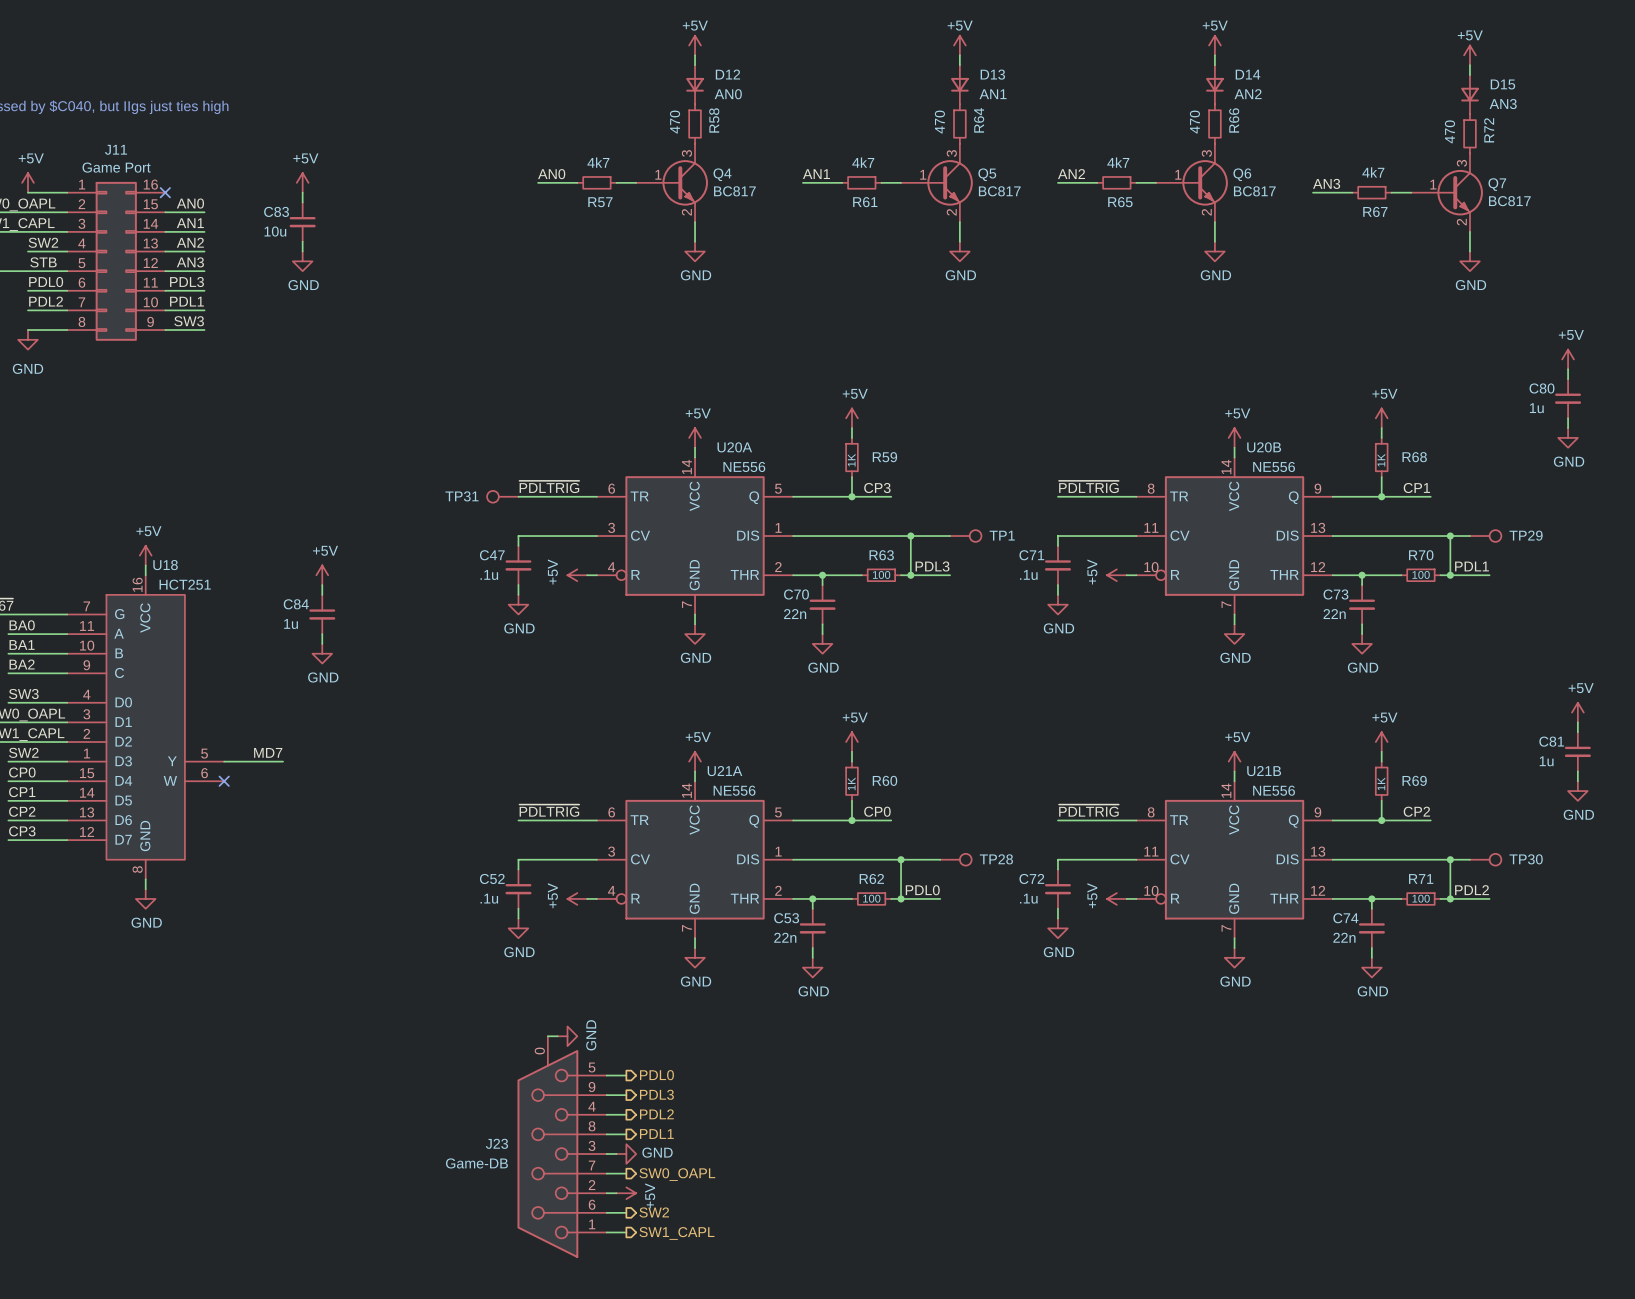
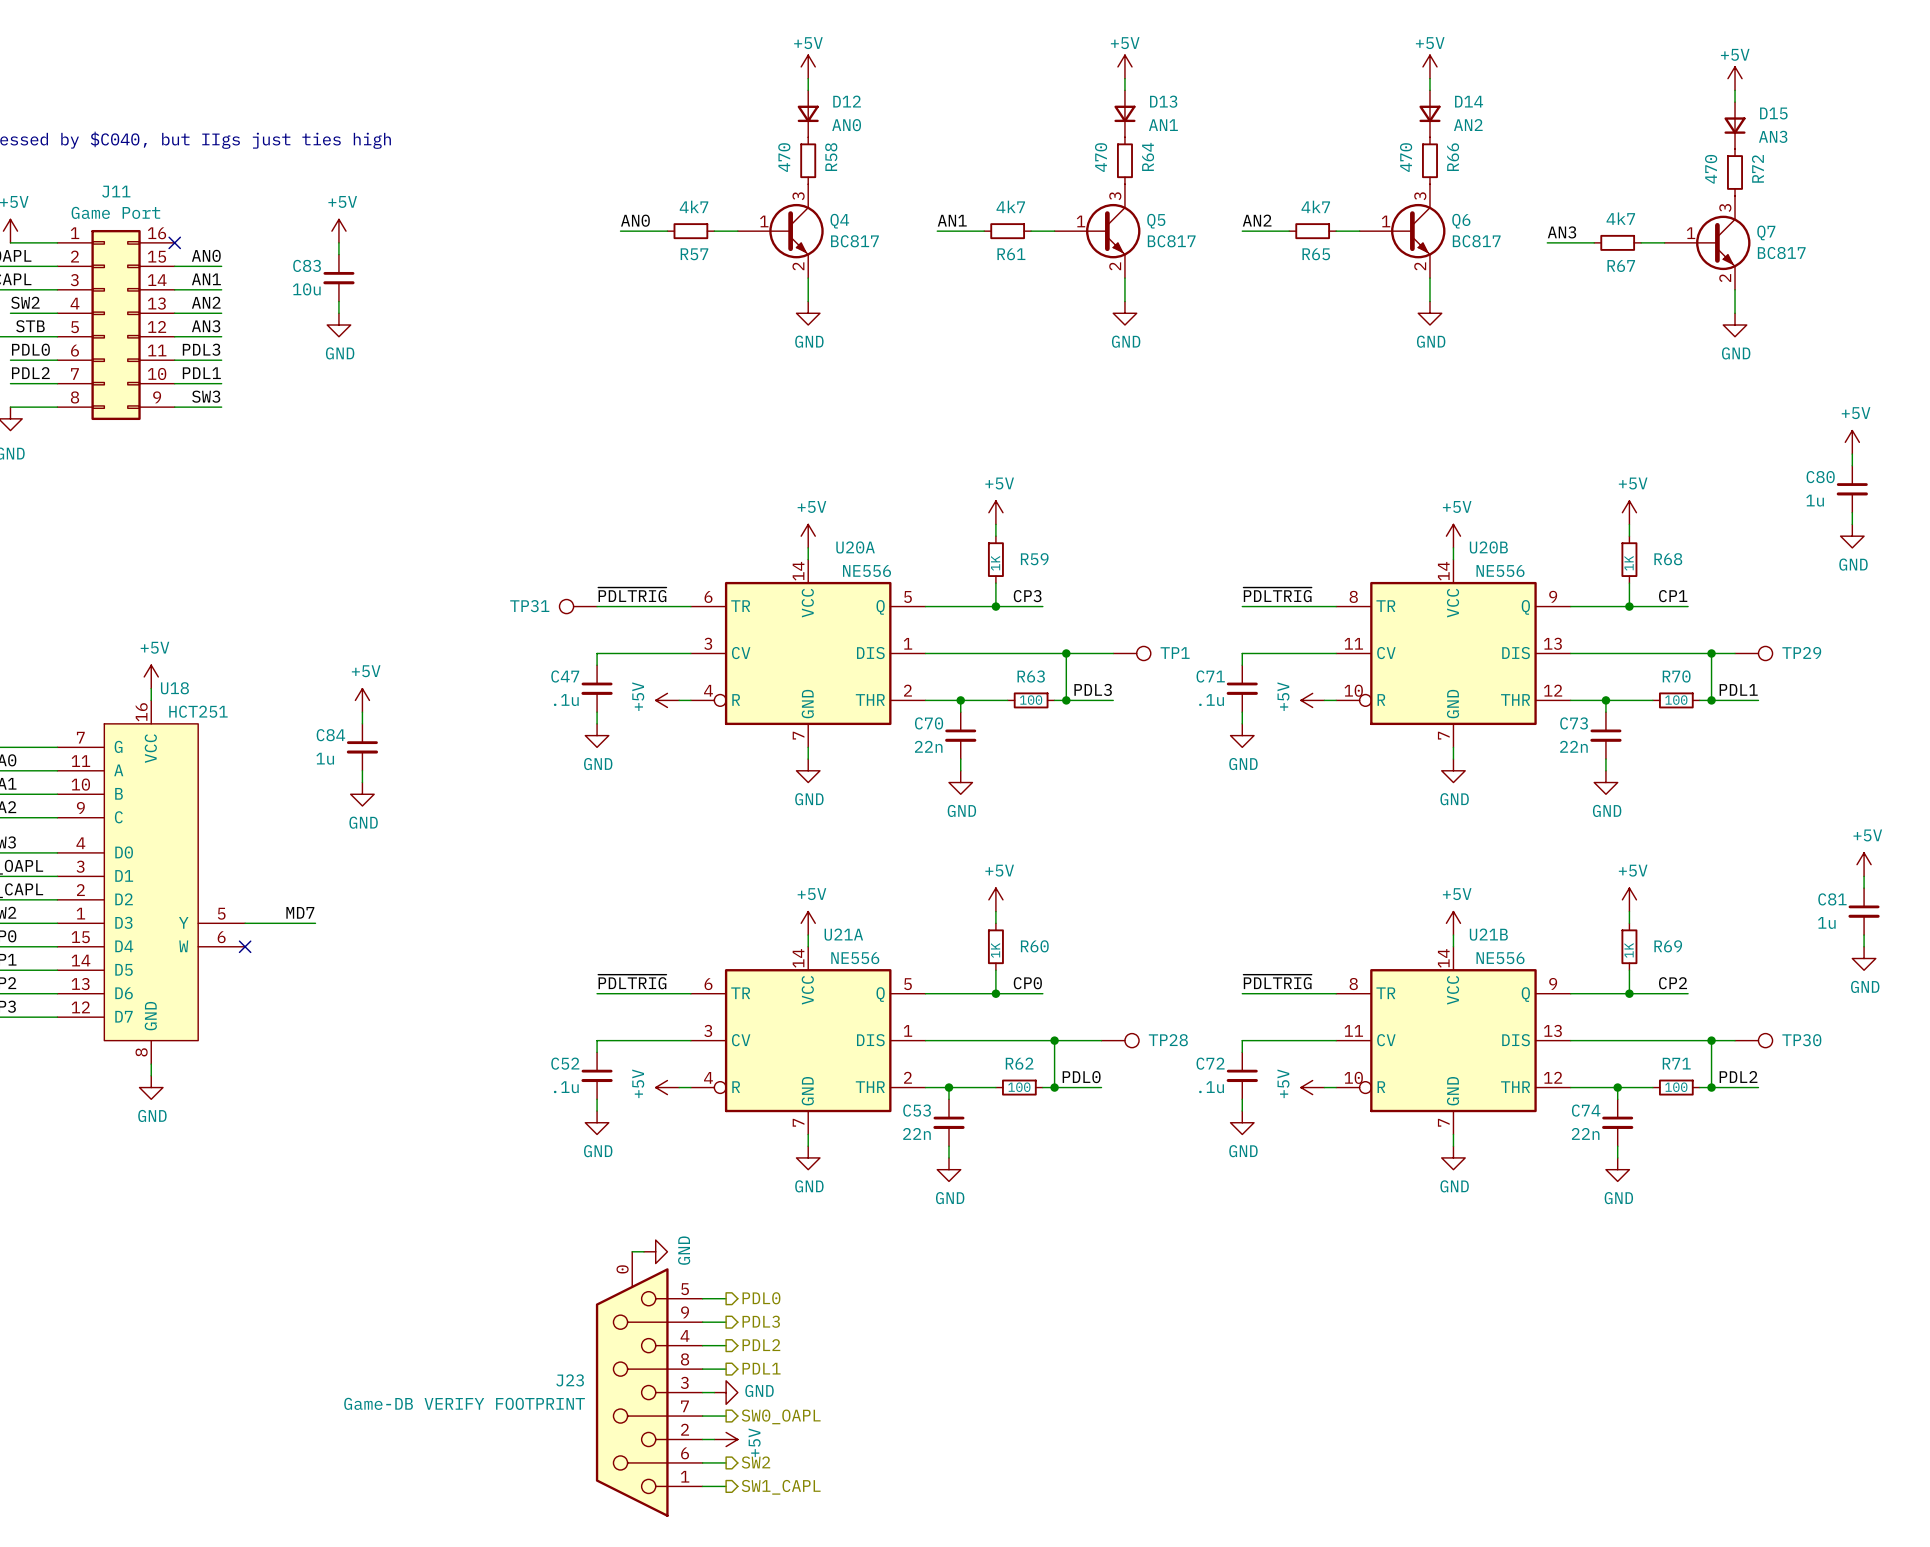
J23 value: Game-DB (476, 1163) -> Game-DB VERIFY FOOTPRINT (464, 1403)

